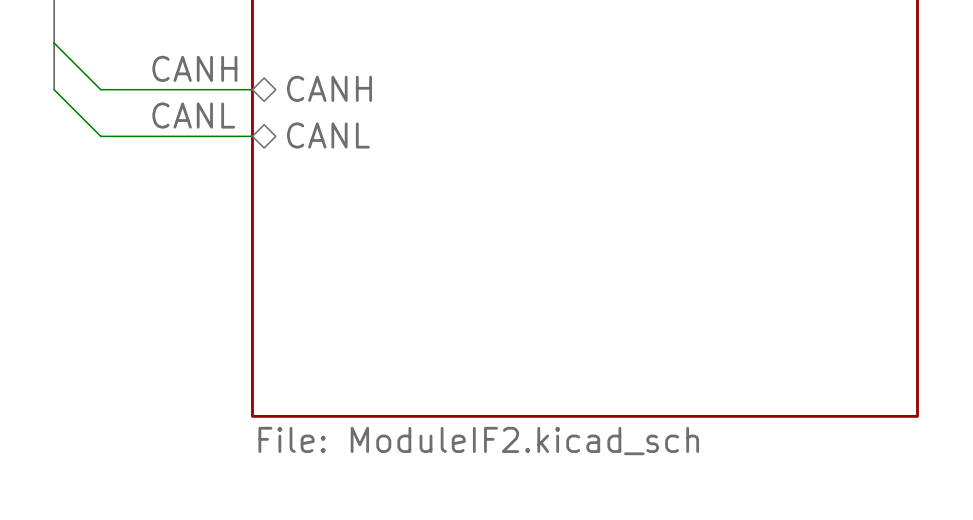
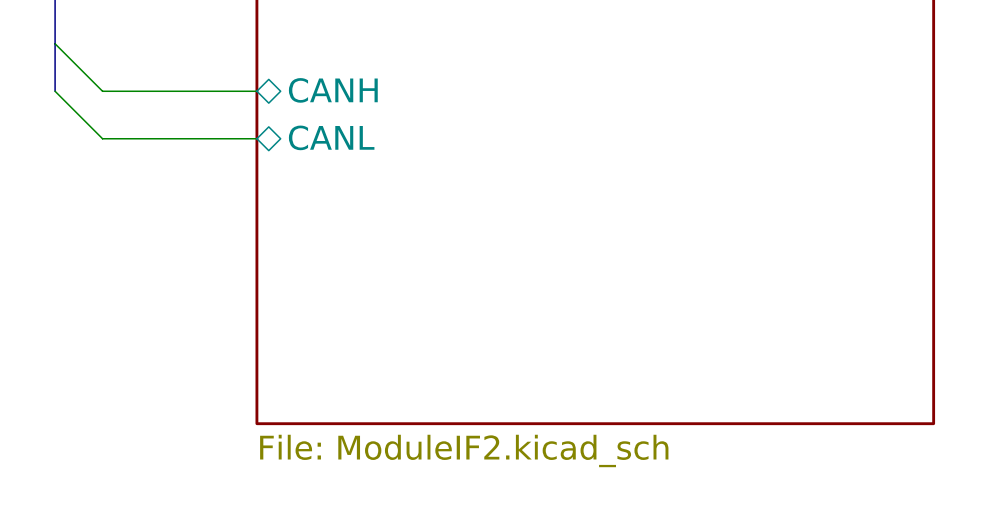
label: CANH (194, 68) -> none
label: CANL (193, 115) -> none

